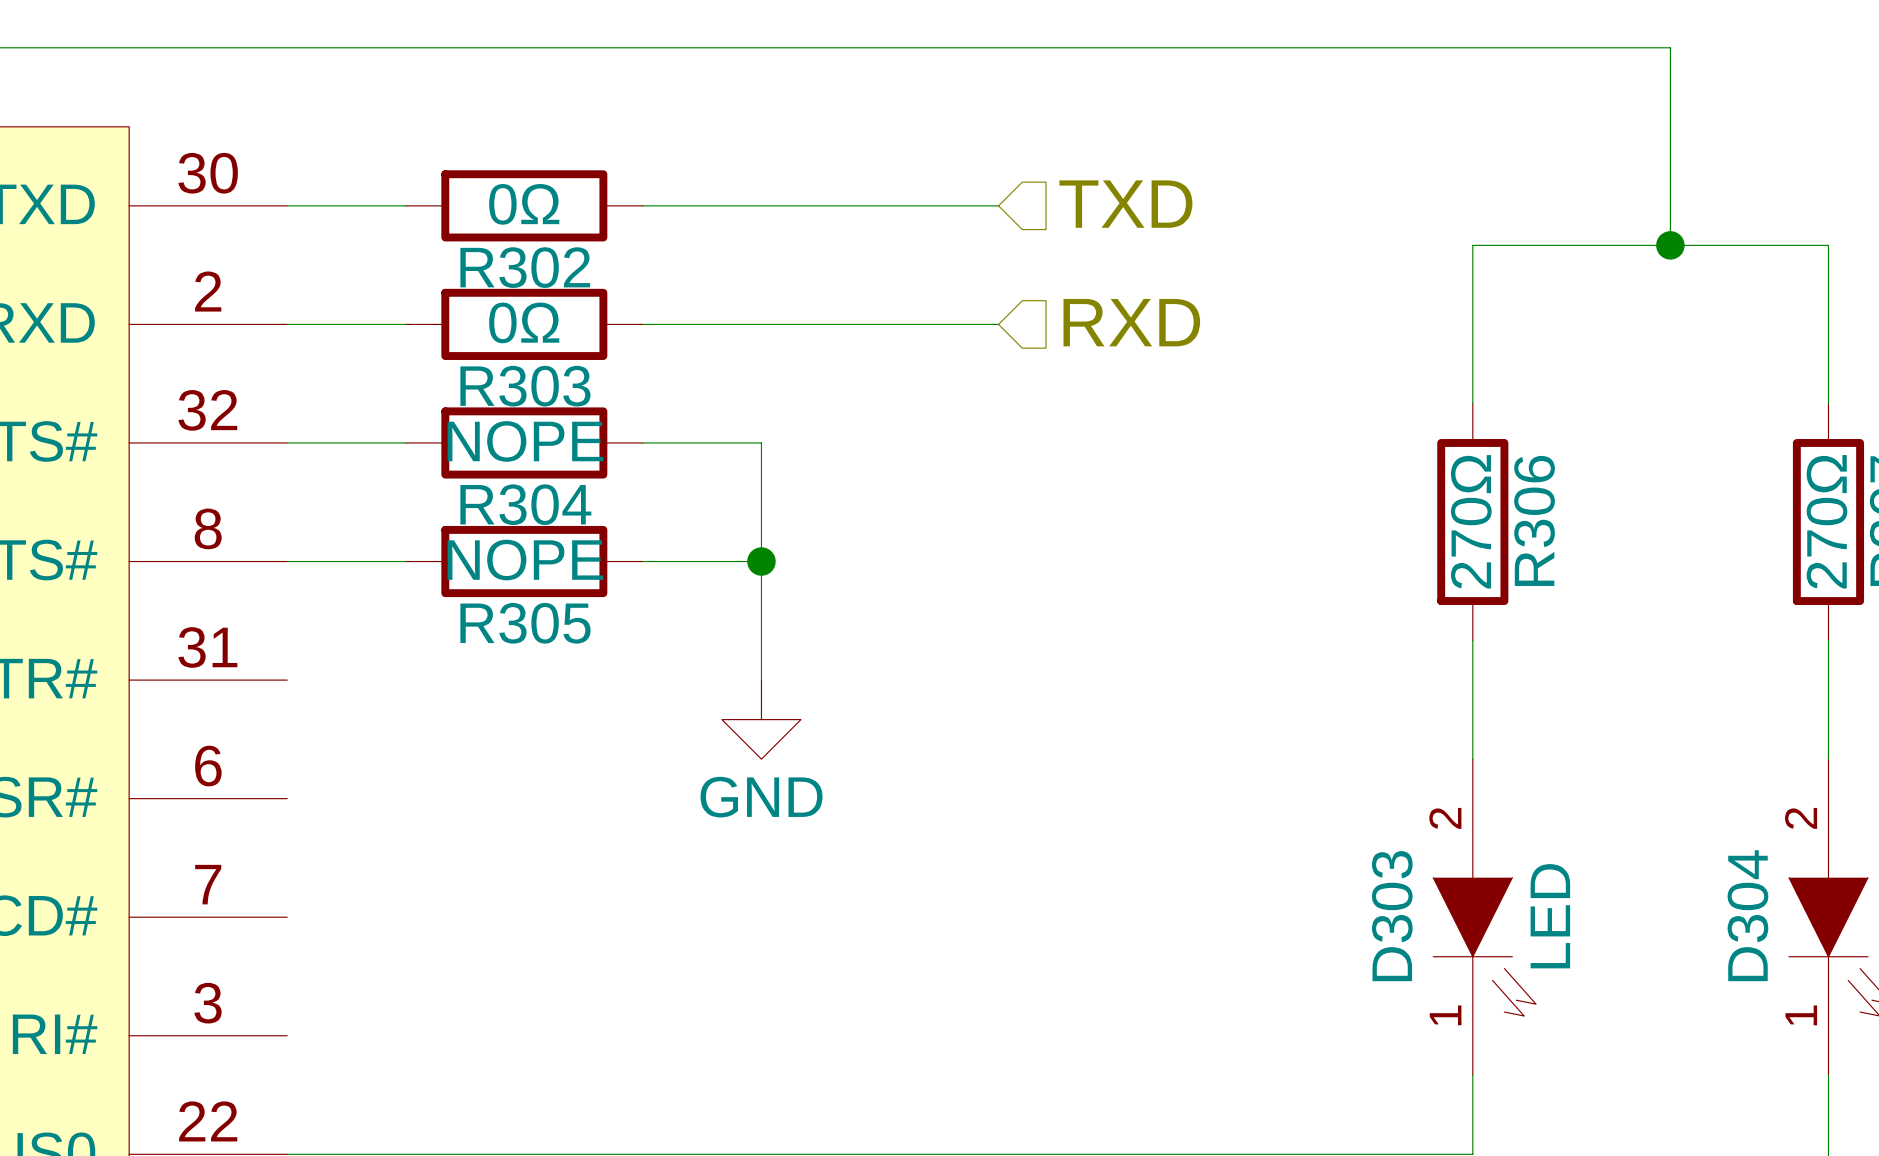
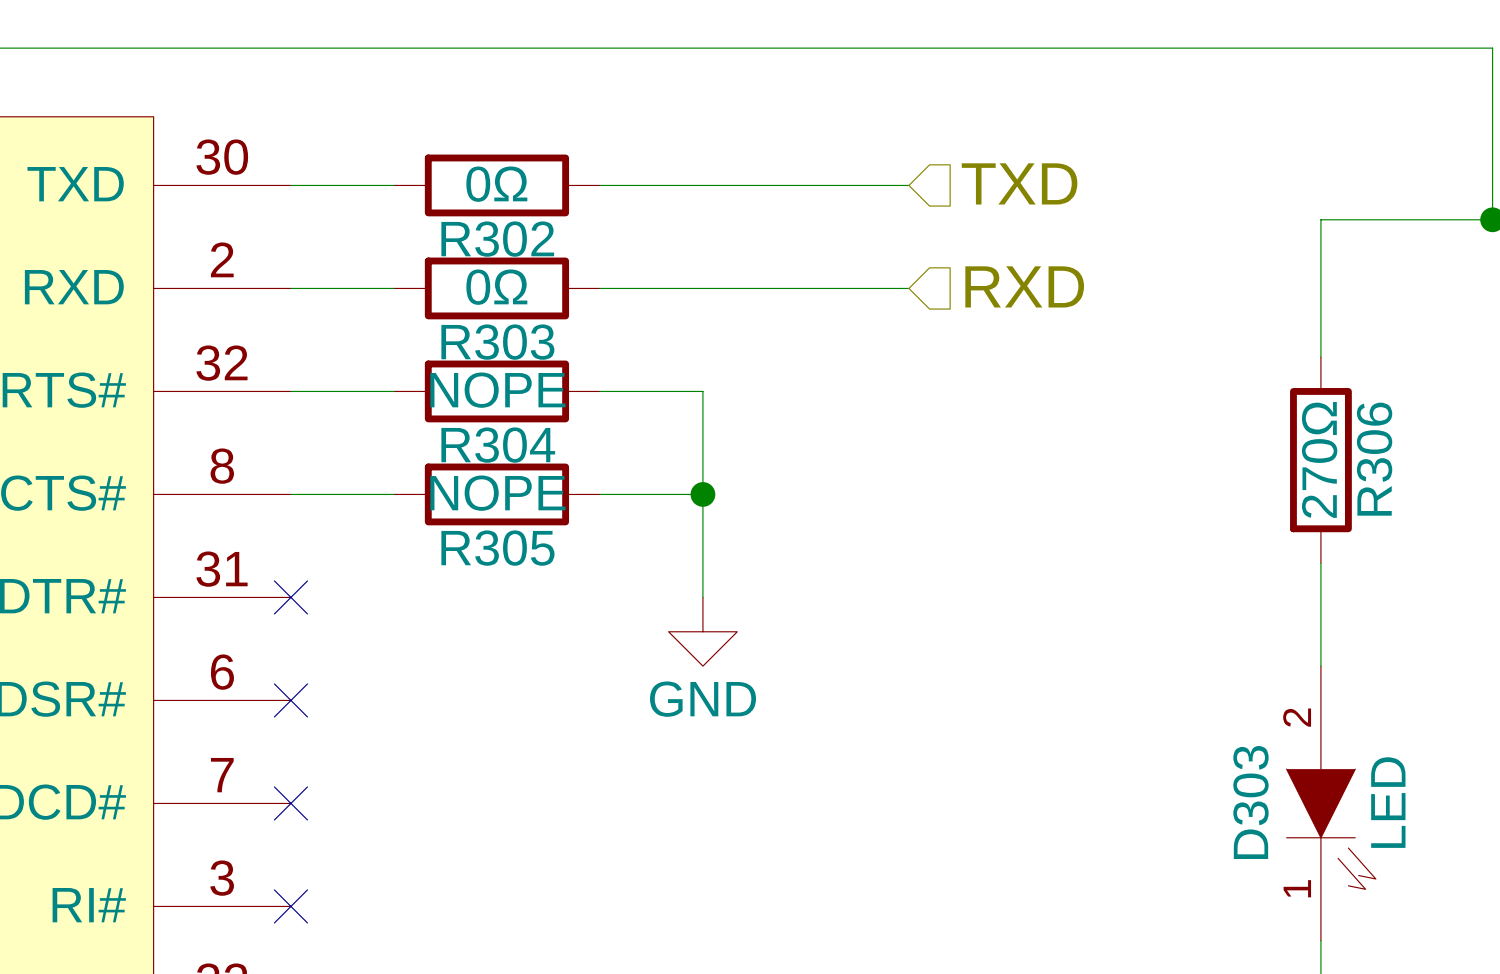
no-connect mark: none -> (290, 597)
no-connect mark: none -> (290, 700)
no-connect mark: none -> (290, 803)
no-connect mark: none -> (290, 906)

